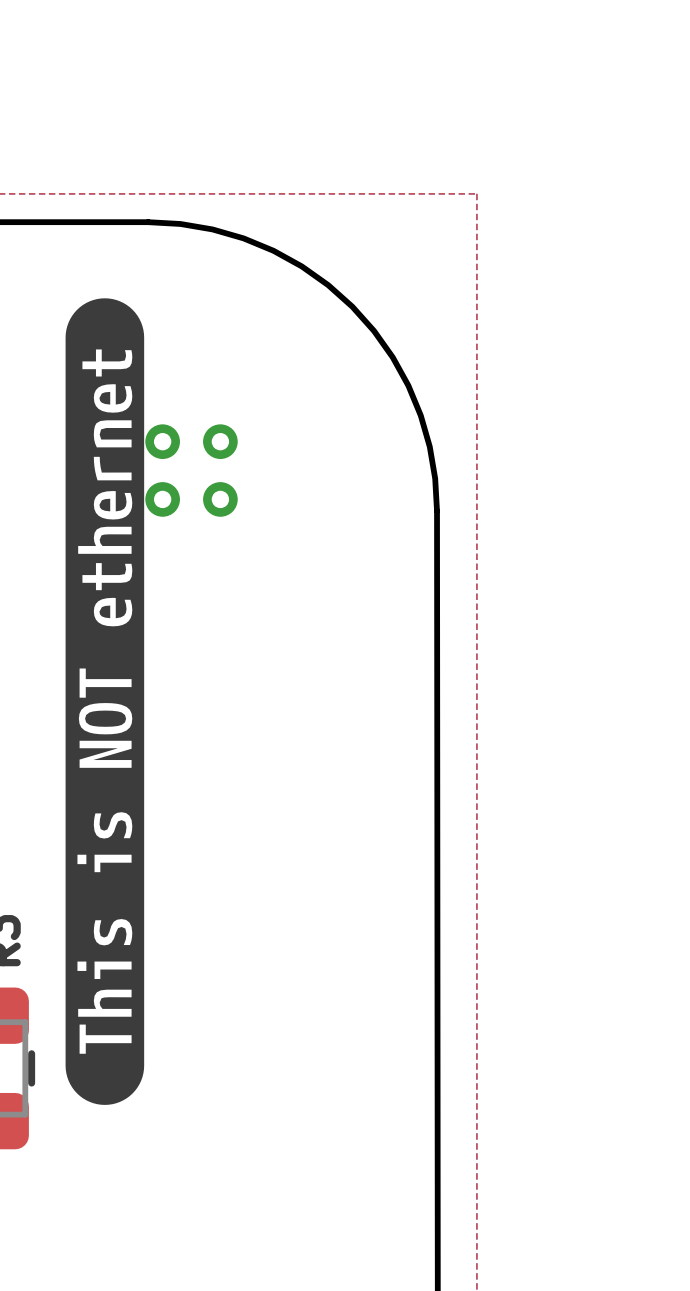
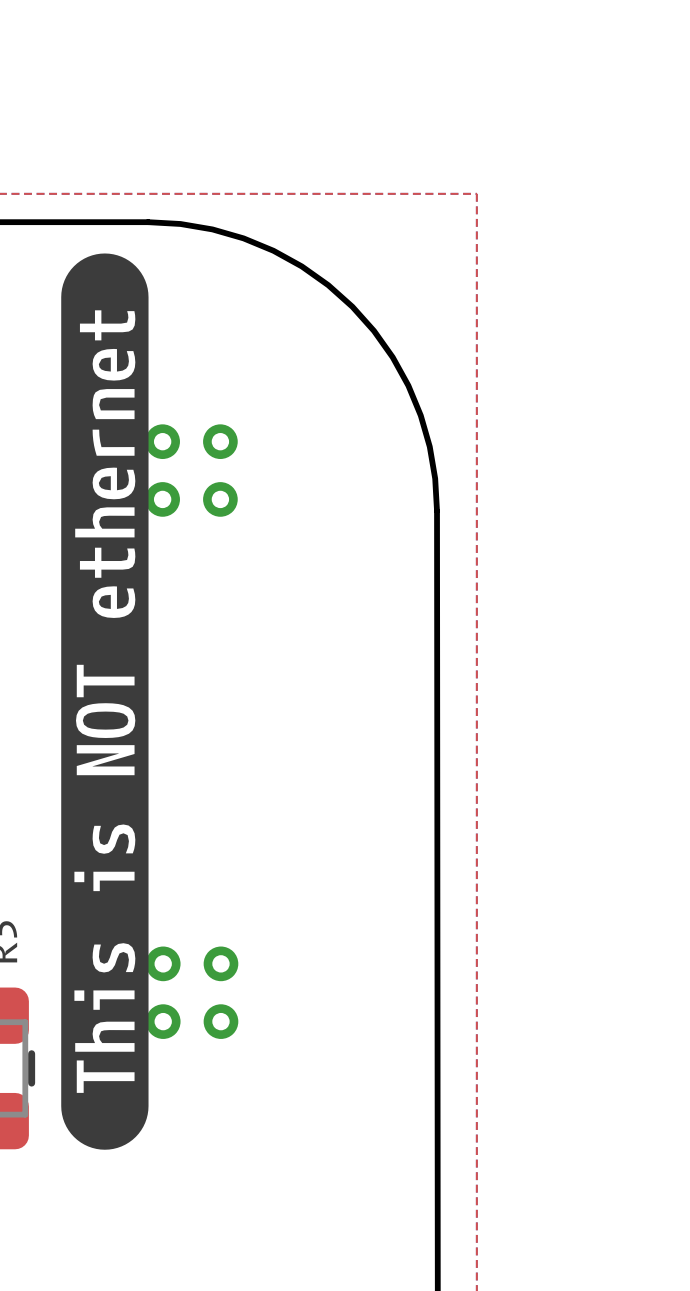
drawing shape: [65, 298, 145, 1105] -> [61, 253, 149, 1150]
via: none -> (163, 963)
via: none -> (220, 963)
via: none -> (163, 1021)
via: none -> (220, 1021)

